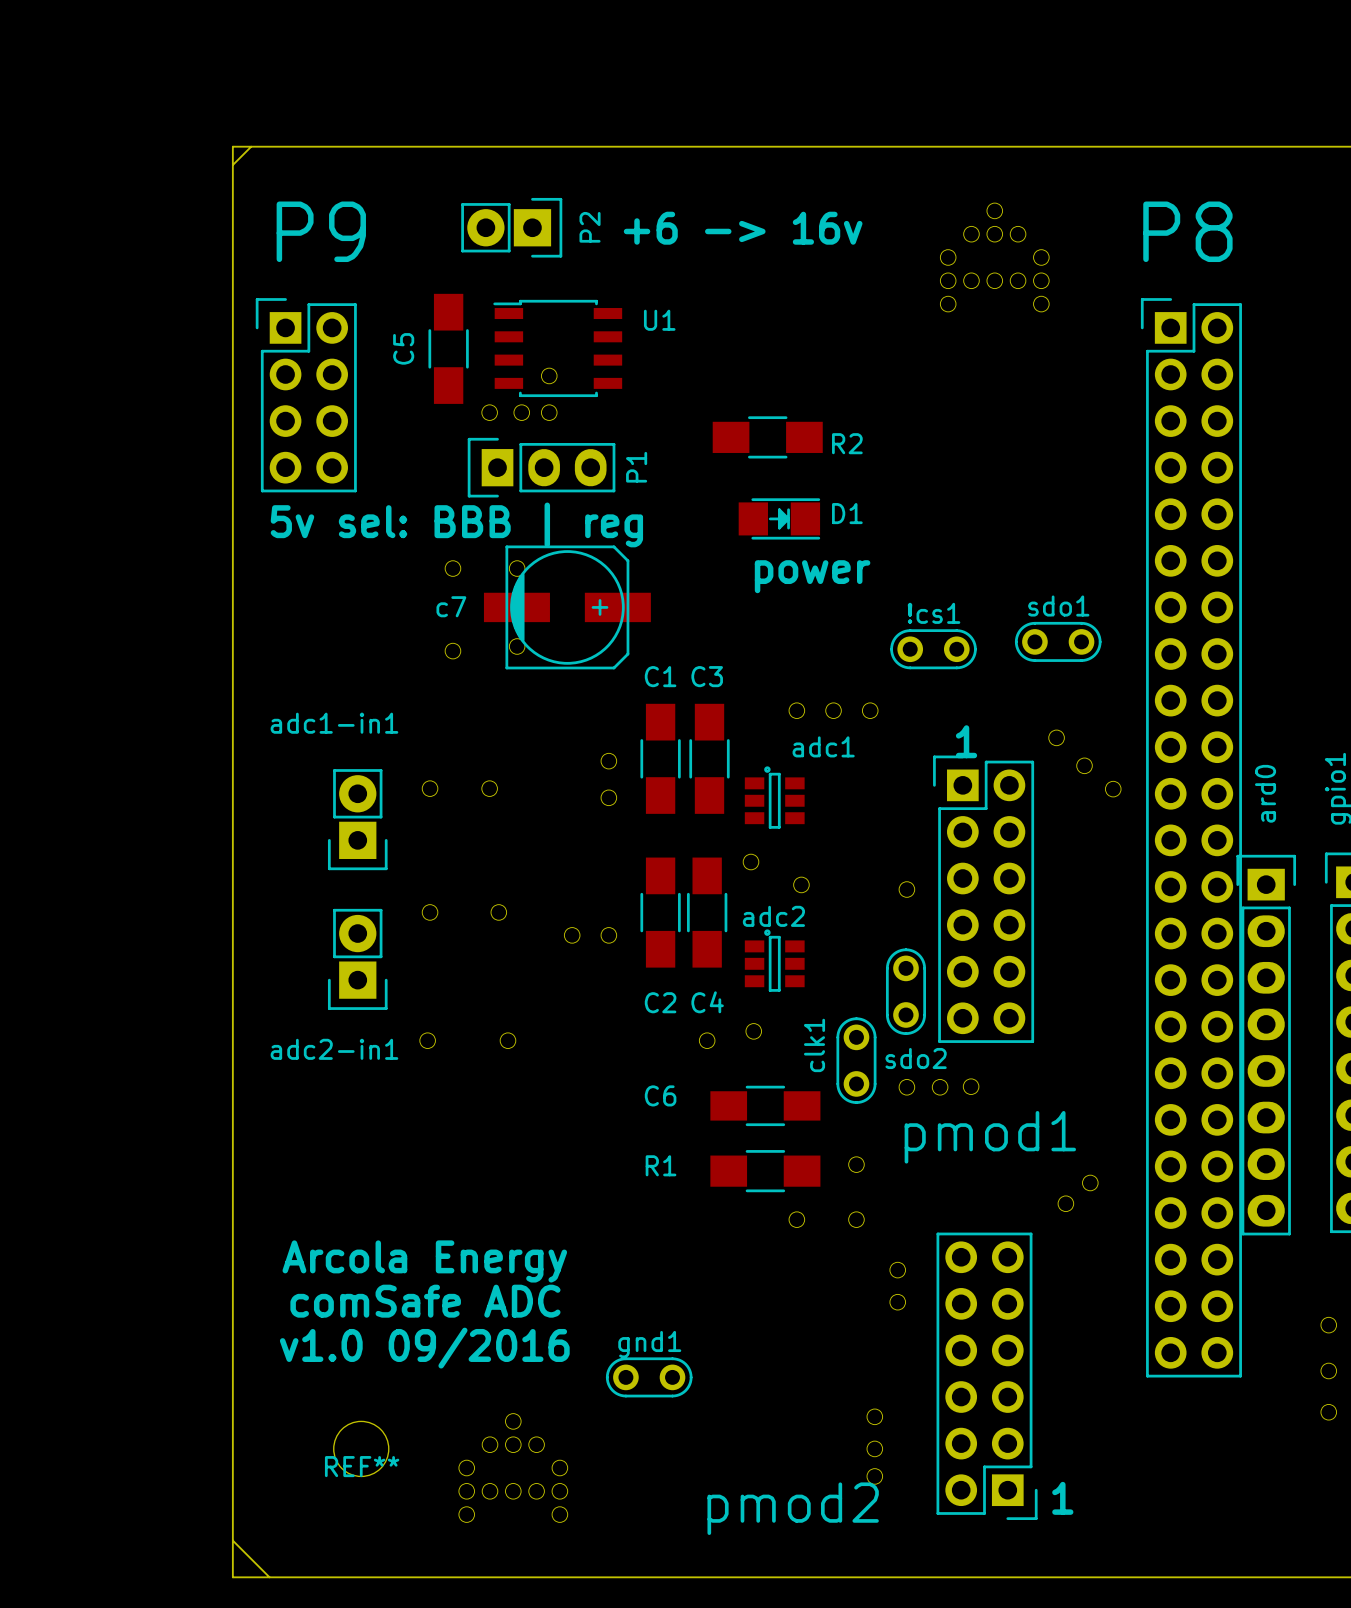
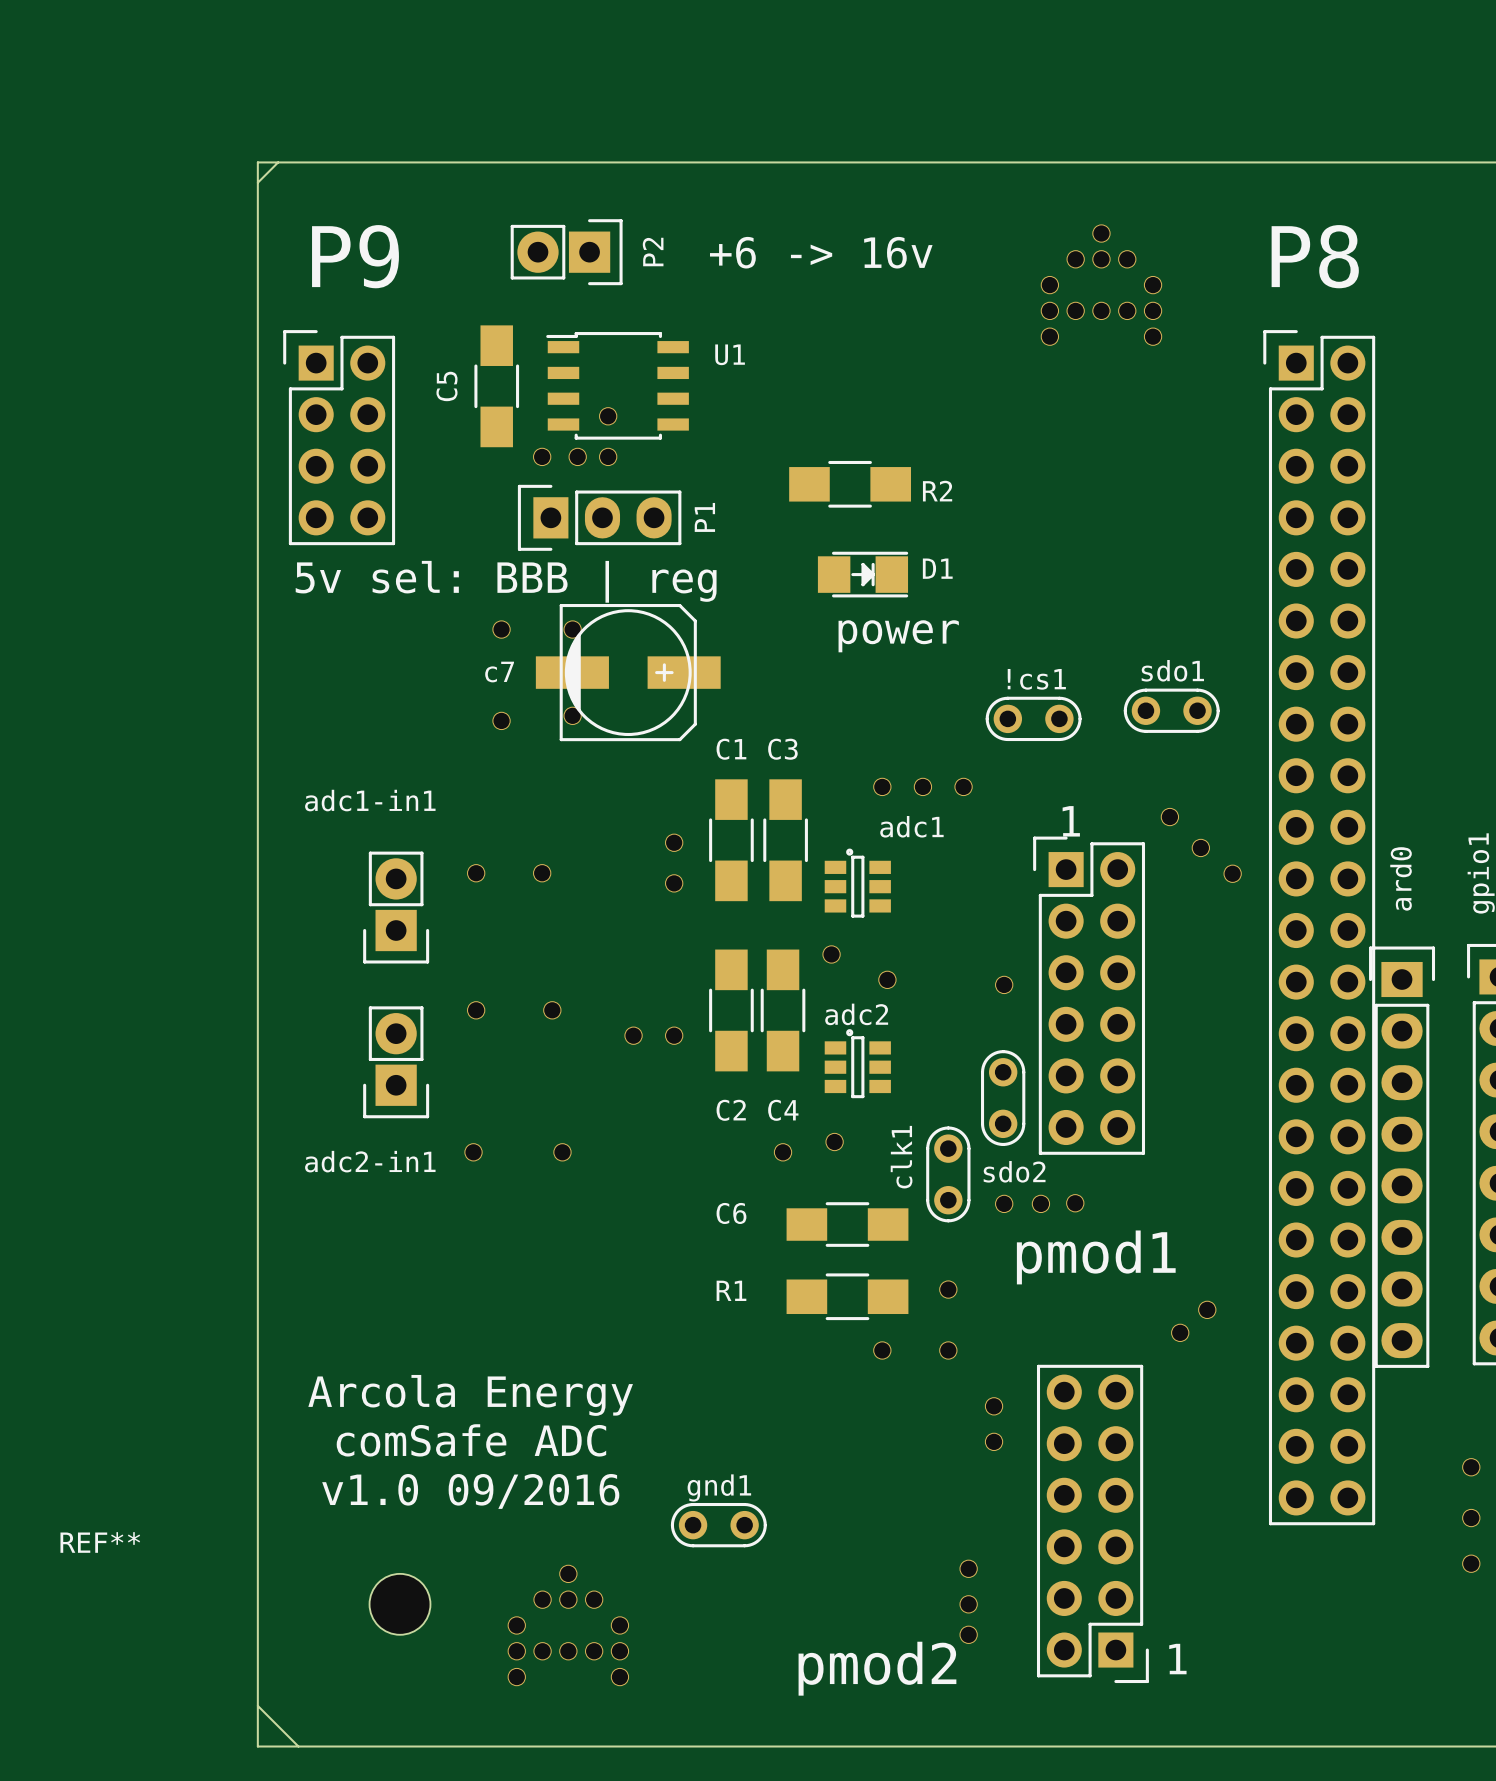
REF** name position: REF** (362, 1466) -> REF** (100, 1542)

